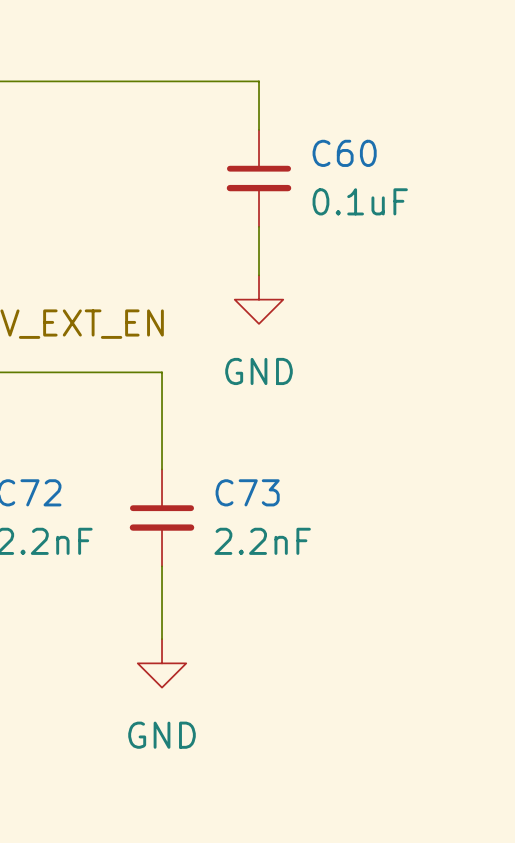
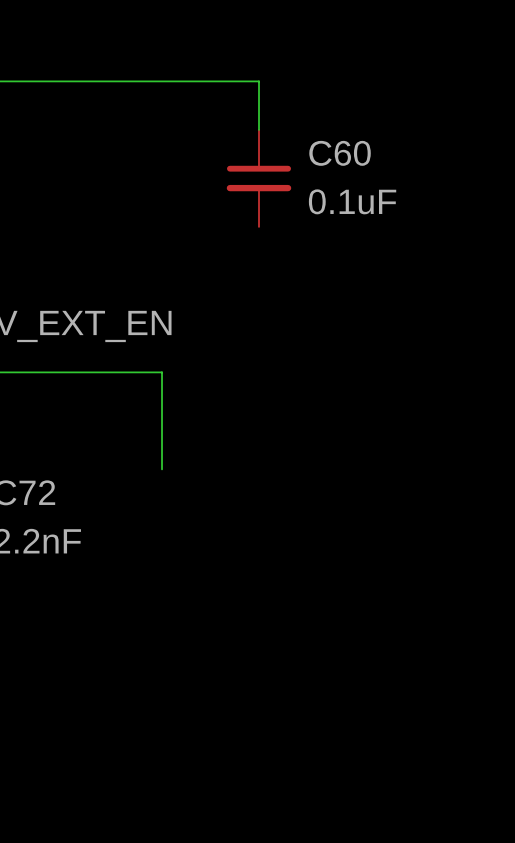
wire: (259, 226) (259, 275) -> none
power symbol: GND (259, 299) -> none
C73: 2.2nF (162, 517) -> none
wire: (162, 566) (162, 639) -> none
power symbol: GND (162, 663) -> none

